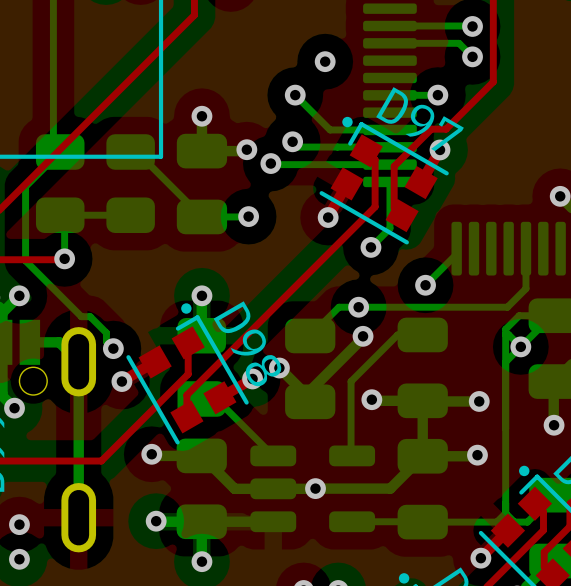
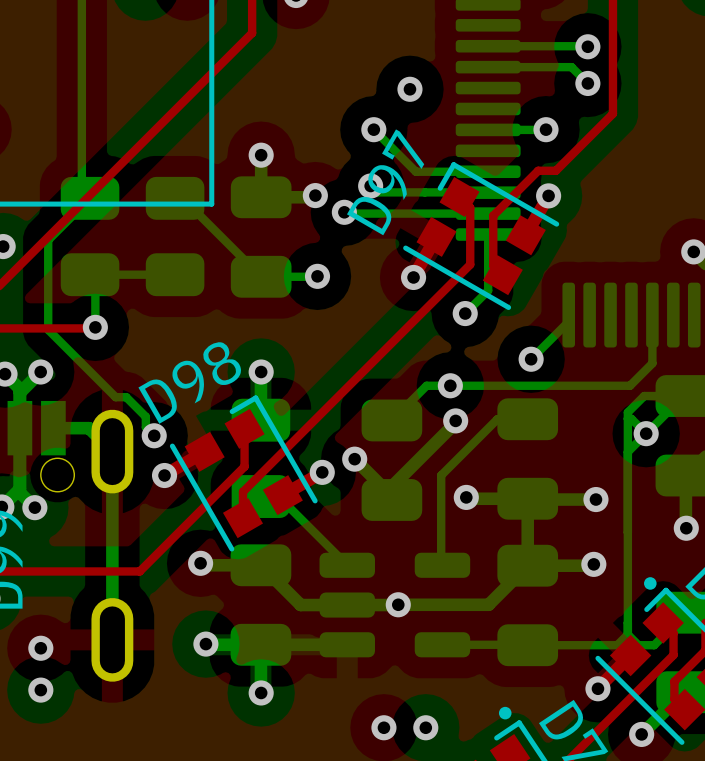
D97 footprint: [319, 116, 449, 245] -> [403, 162, 560, 310]
D97 name rotation: 0° (420, 119) -> 90° counterclockwise (385, 182)
D98 footprint: [126, 303, 249, 445] -> [169, 395, 318, 552]
D98 name rotation: 0° (247, 343) -> 90° counterclockwise (189, 382)

